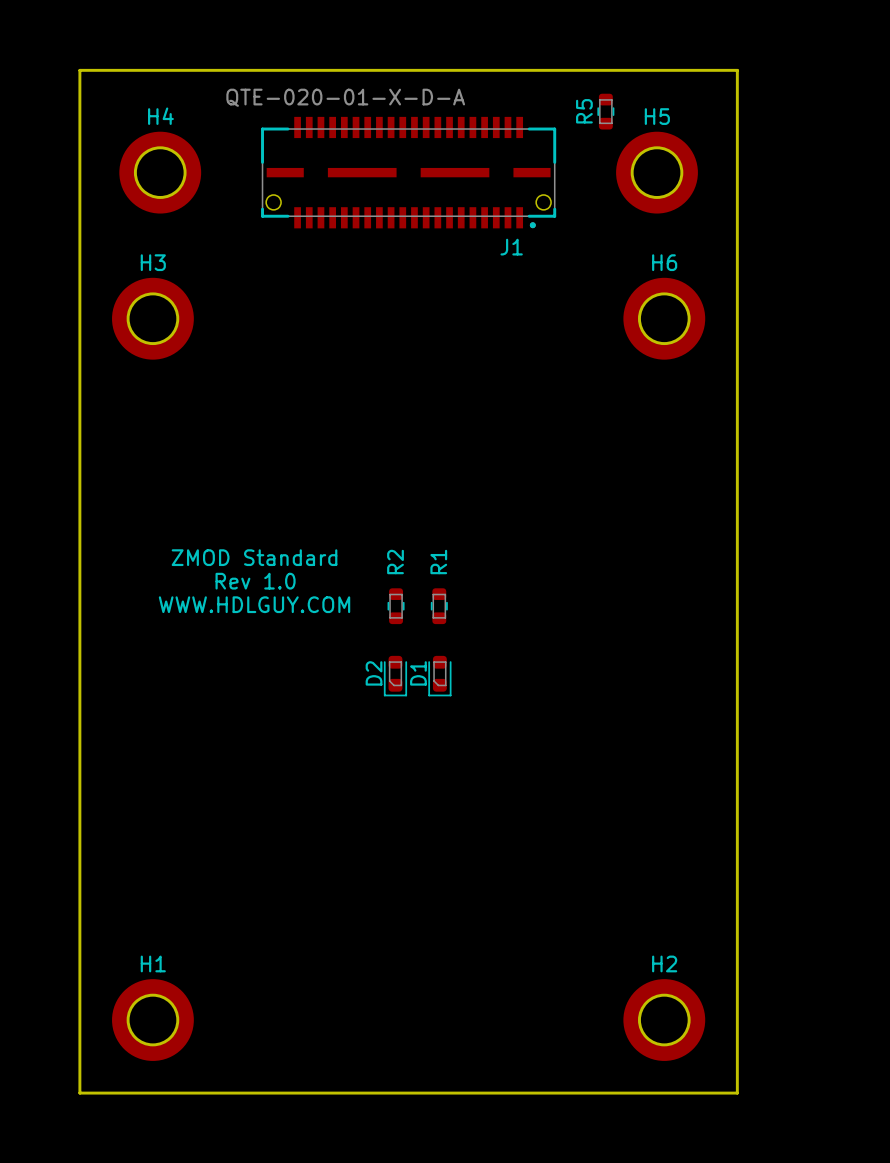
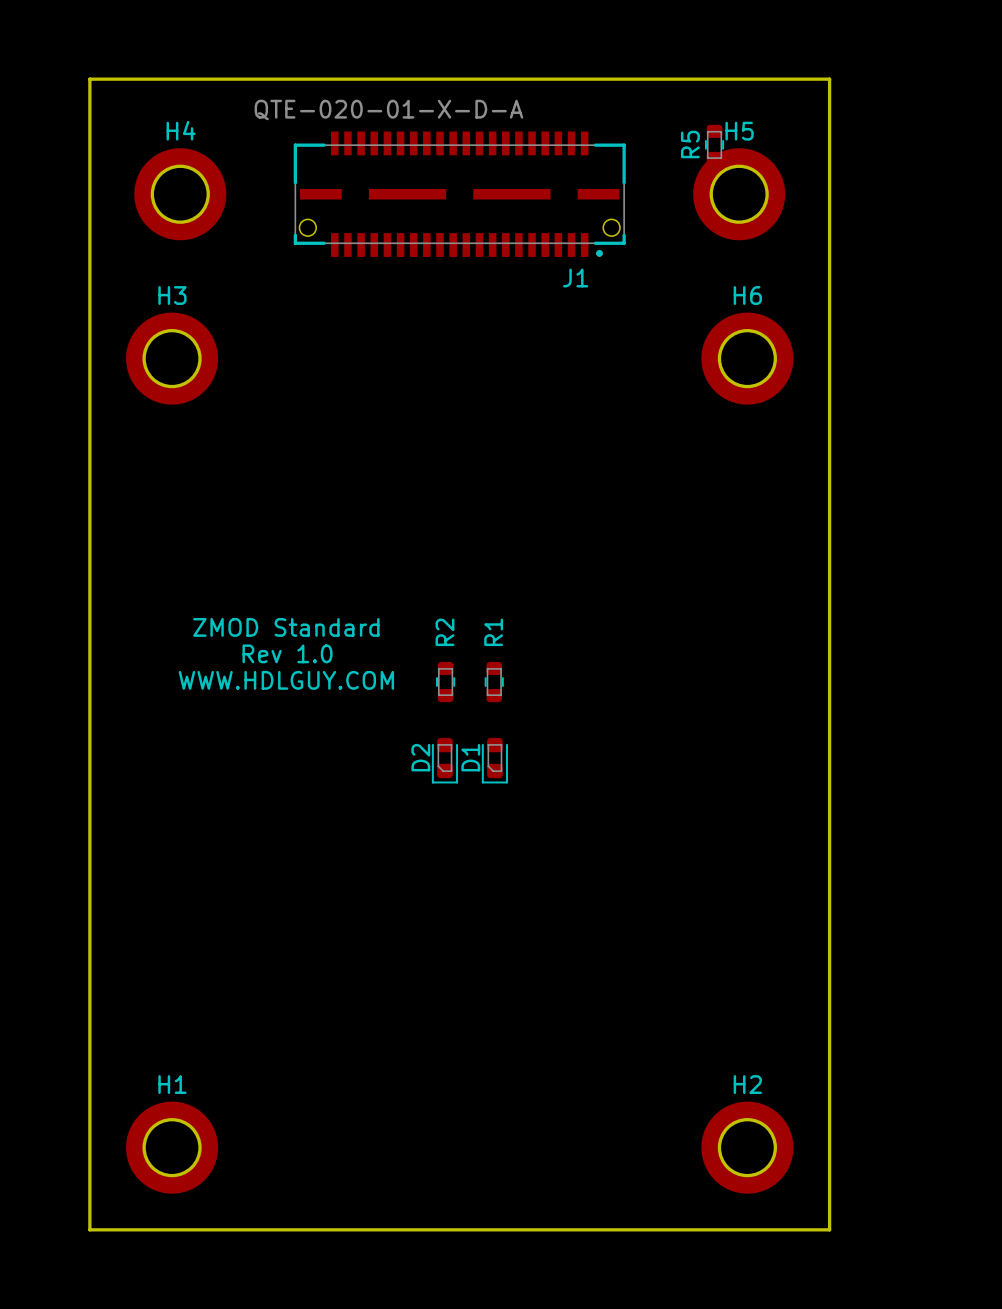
R5 position: (605, 111) -> (714, 144)

